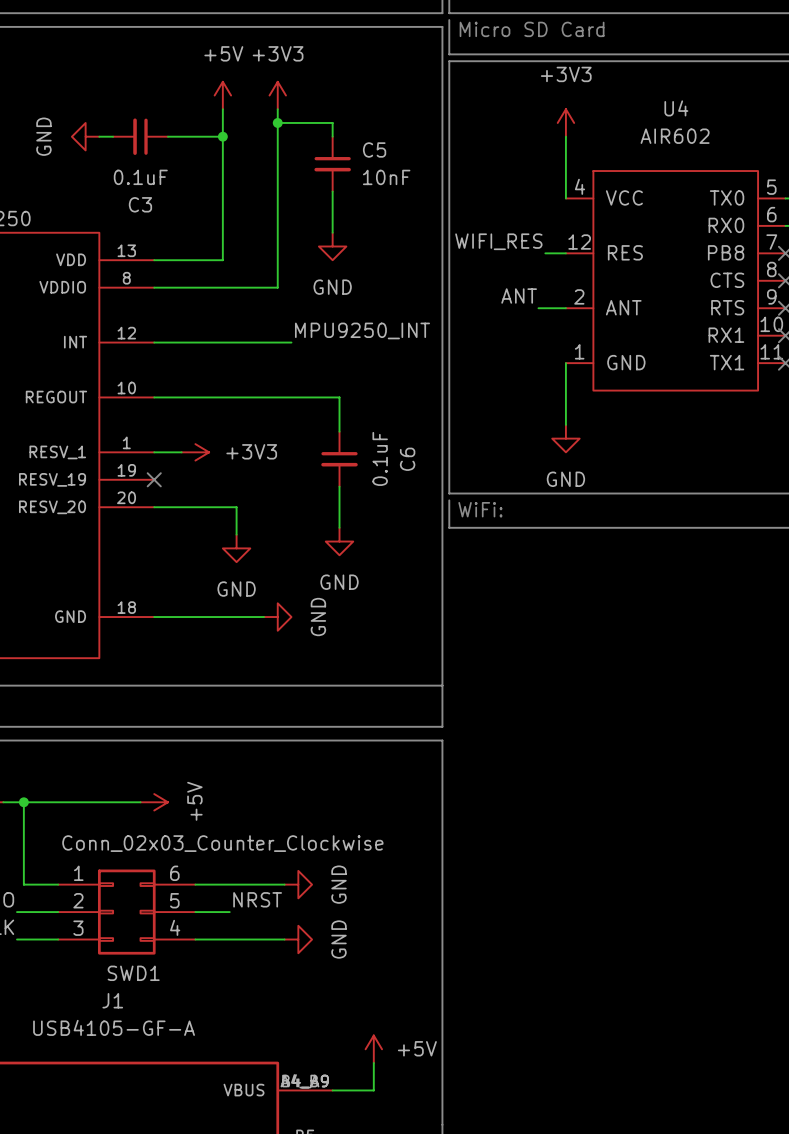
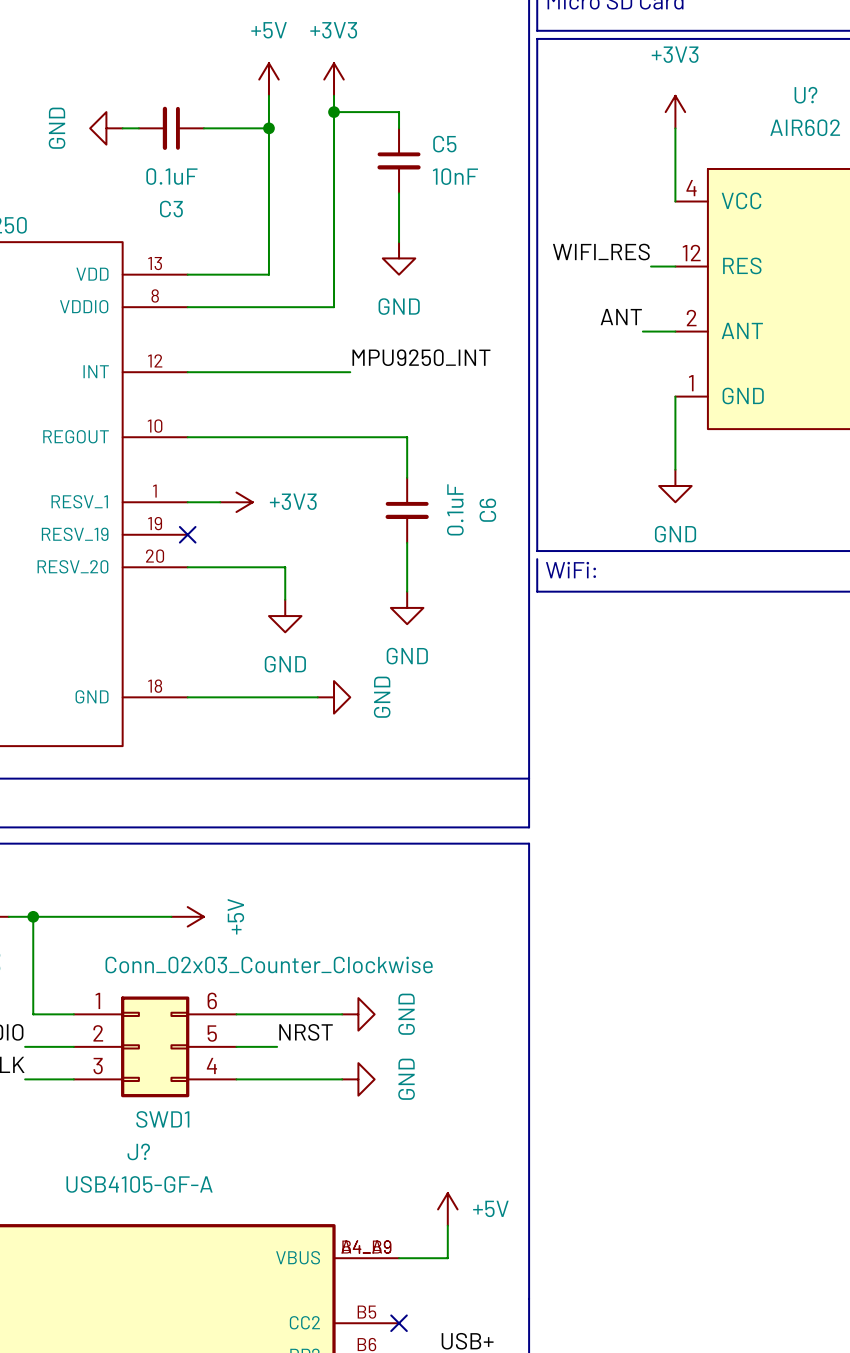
U4 name: U4 (676, 108) -> U? (805, 95)
J1 name: J1 (112, 1000) -> J? (138, 1151)

